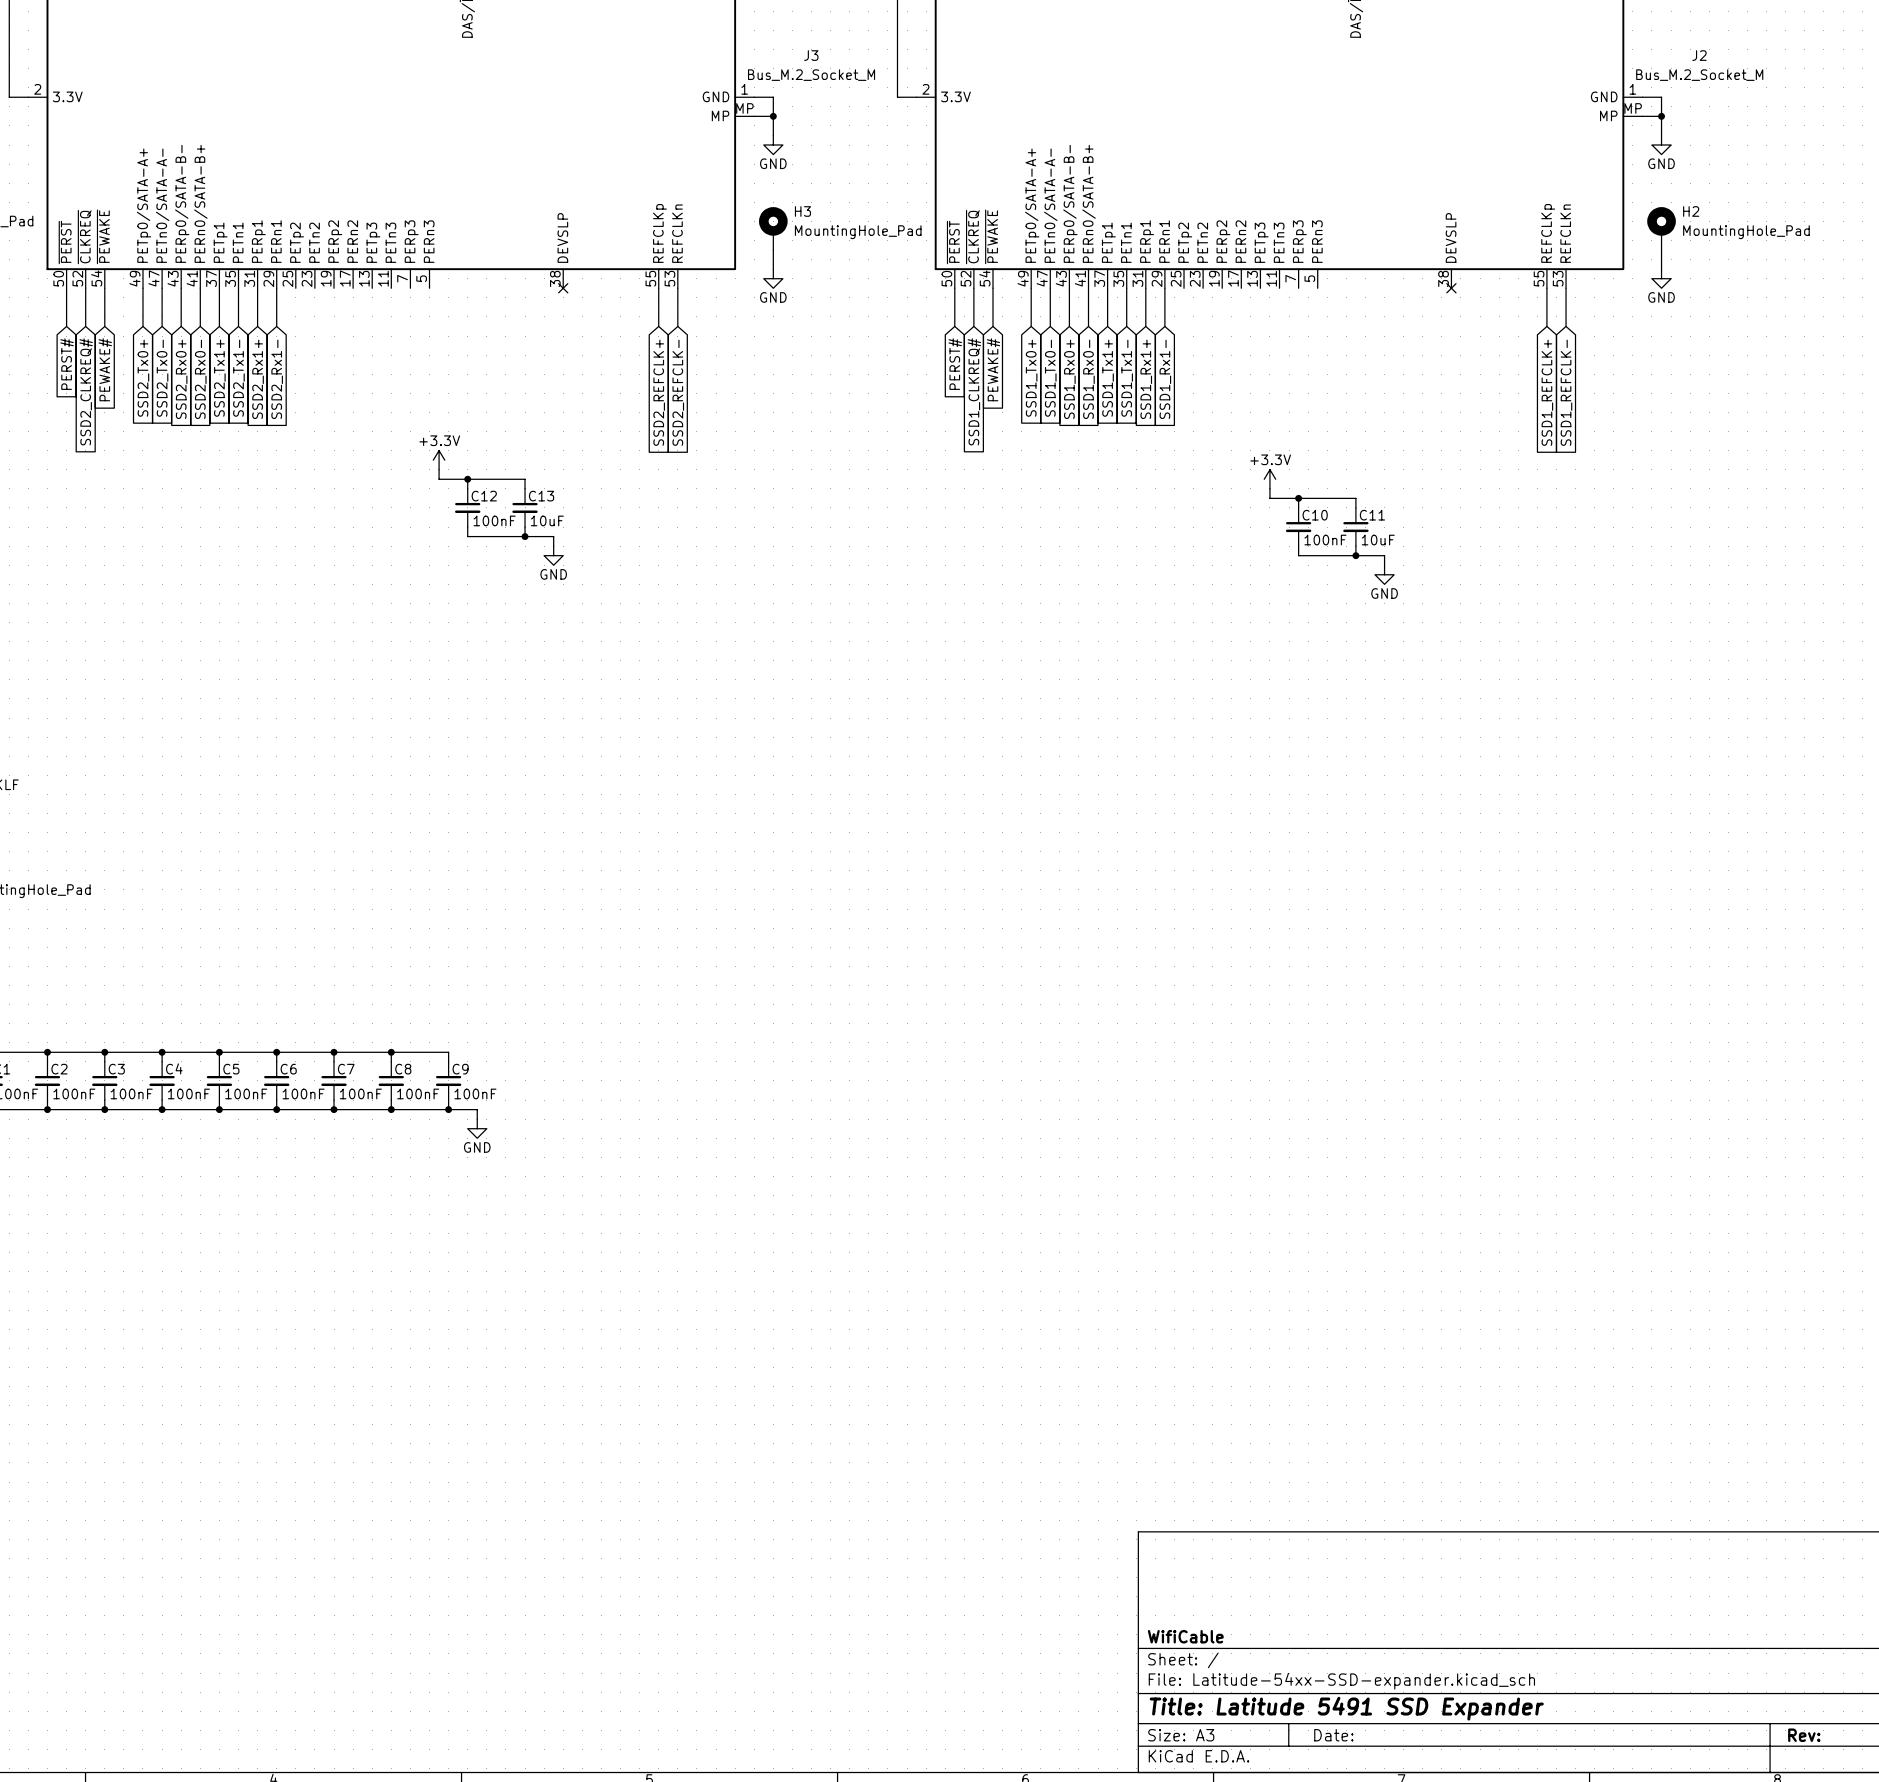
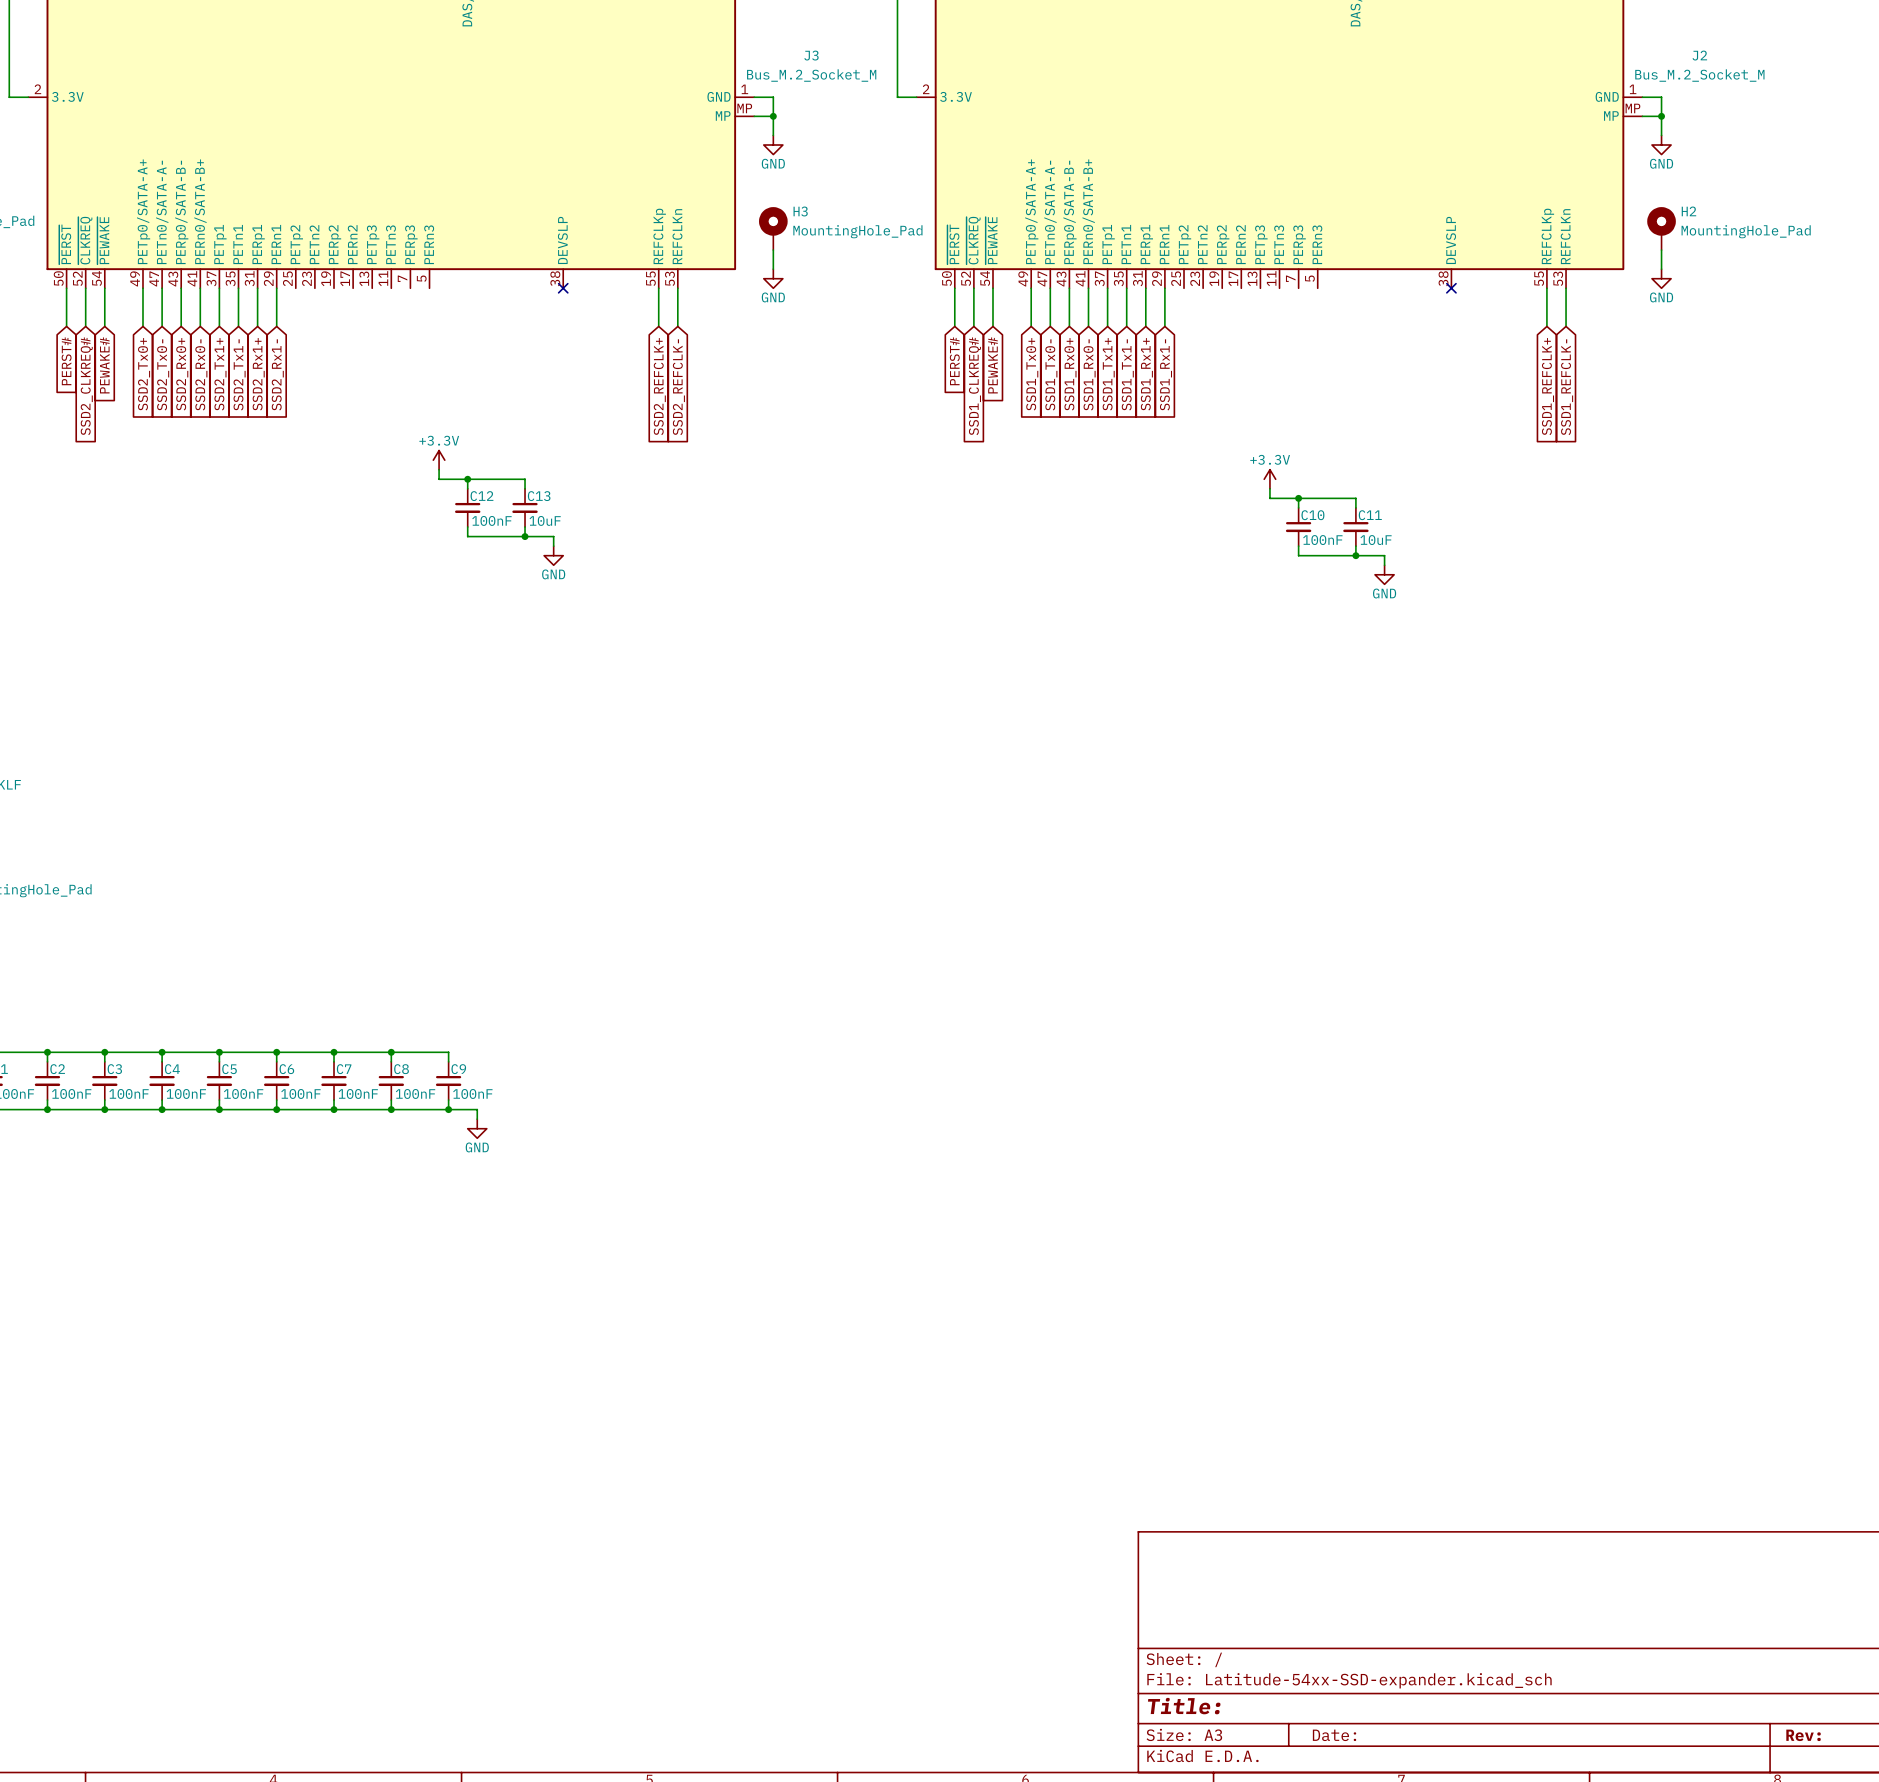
title block: WifiCable (1185, 1636) -> none
title block: Title: Latitude 5491 SSD Expander (1346, 1708) -> Title: (1184, 1706)

